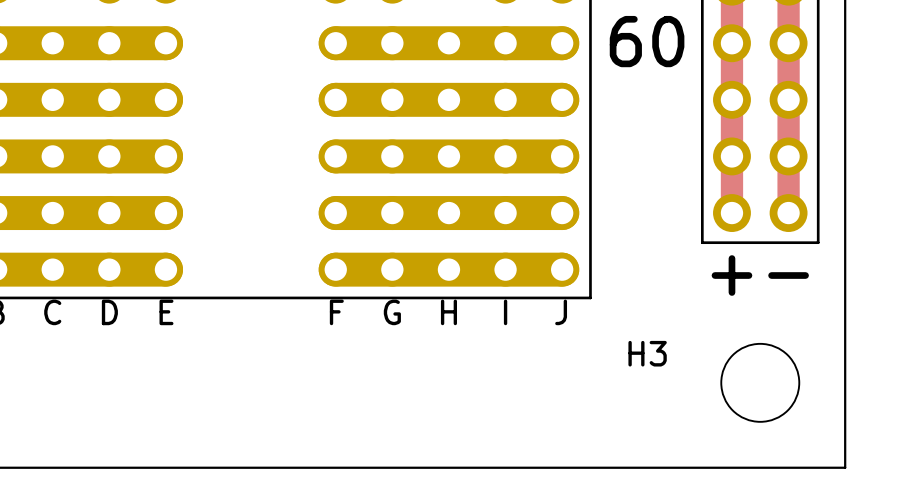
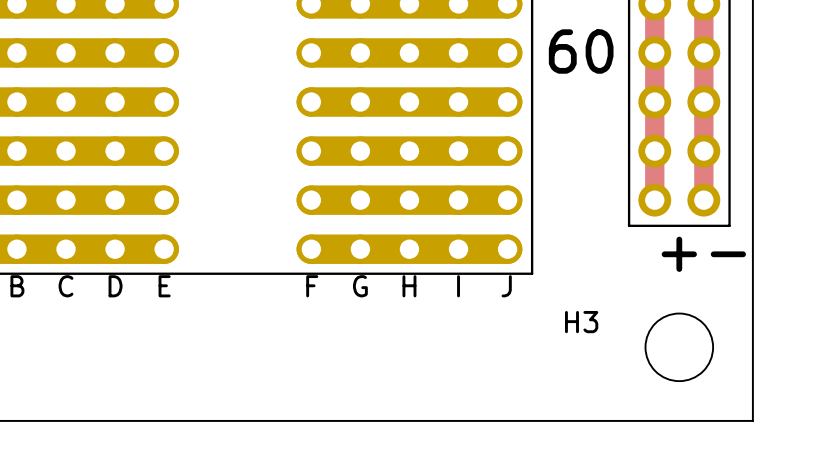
text position: + (731, 275) -> + (679, 254)
text position: - (788, 275) -> - (728, 254)

